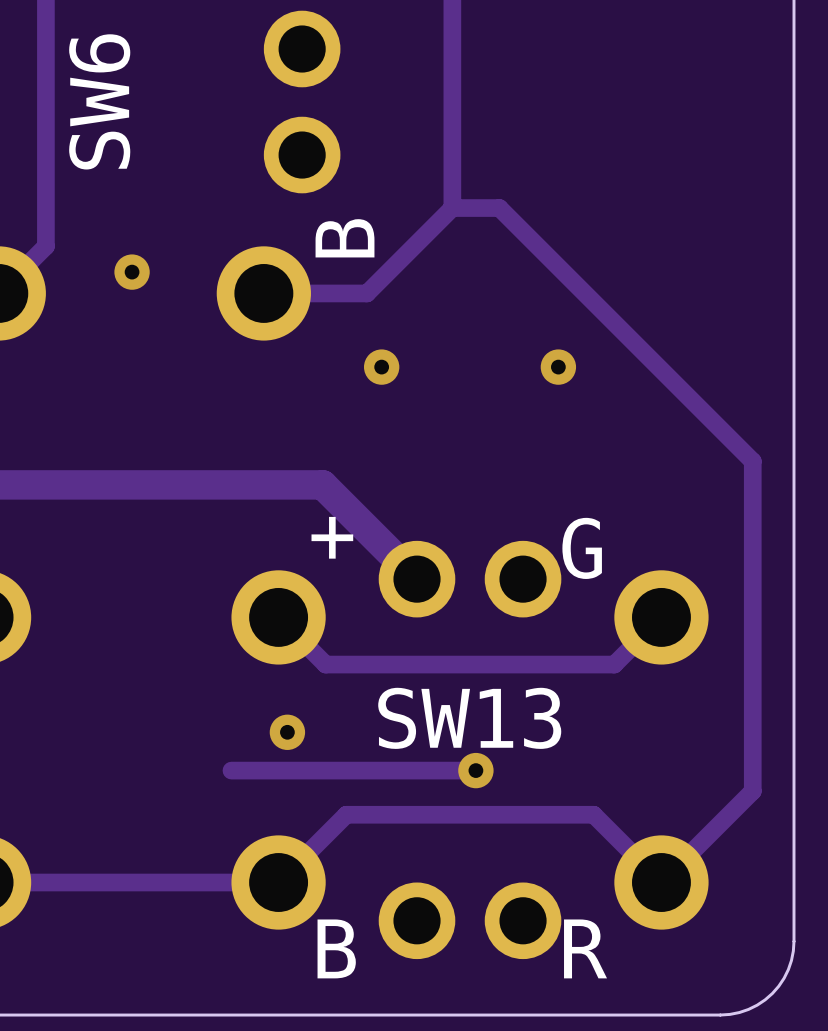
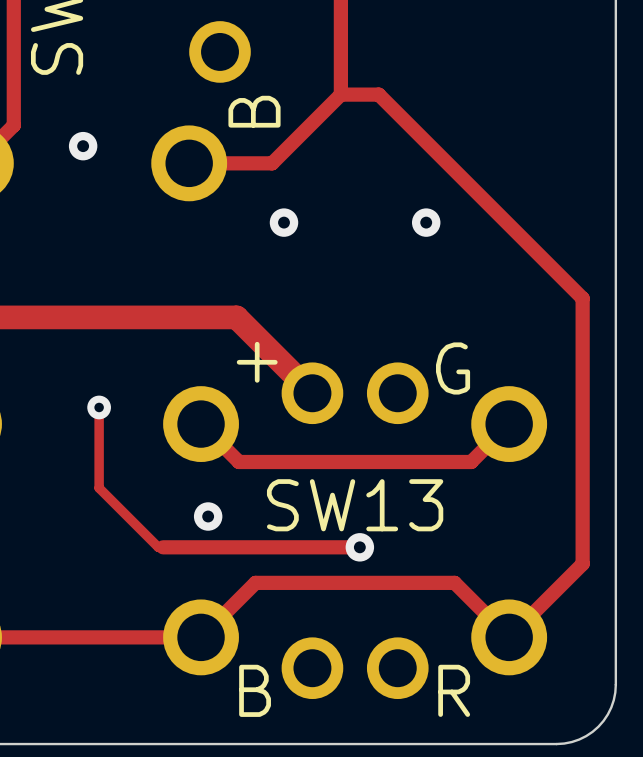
track: none -> (99, 407) (99, 488) (158, 547) (163, 547)
via: none -> (99, 407)

